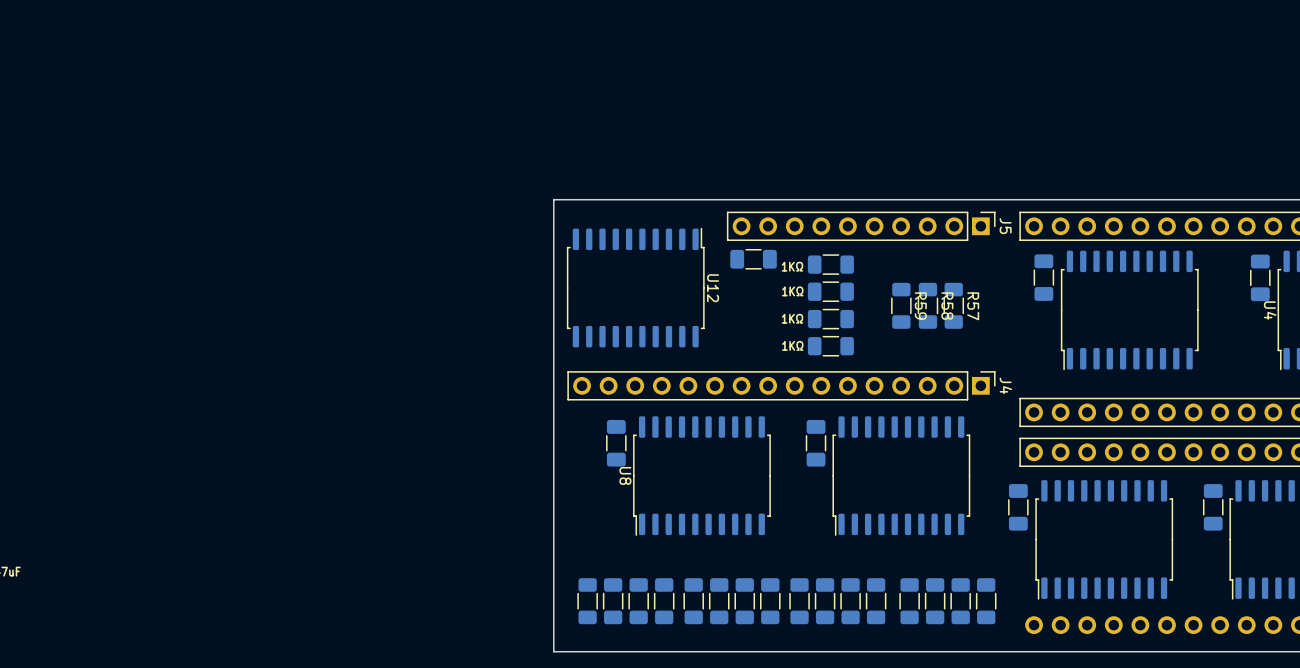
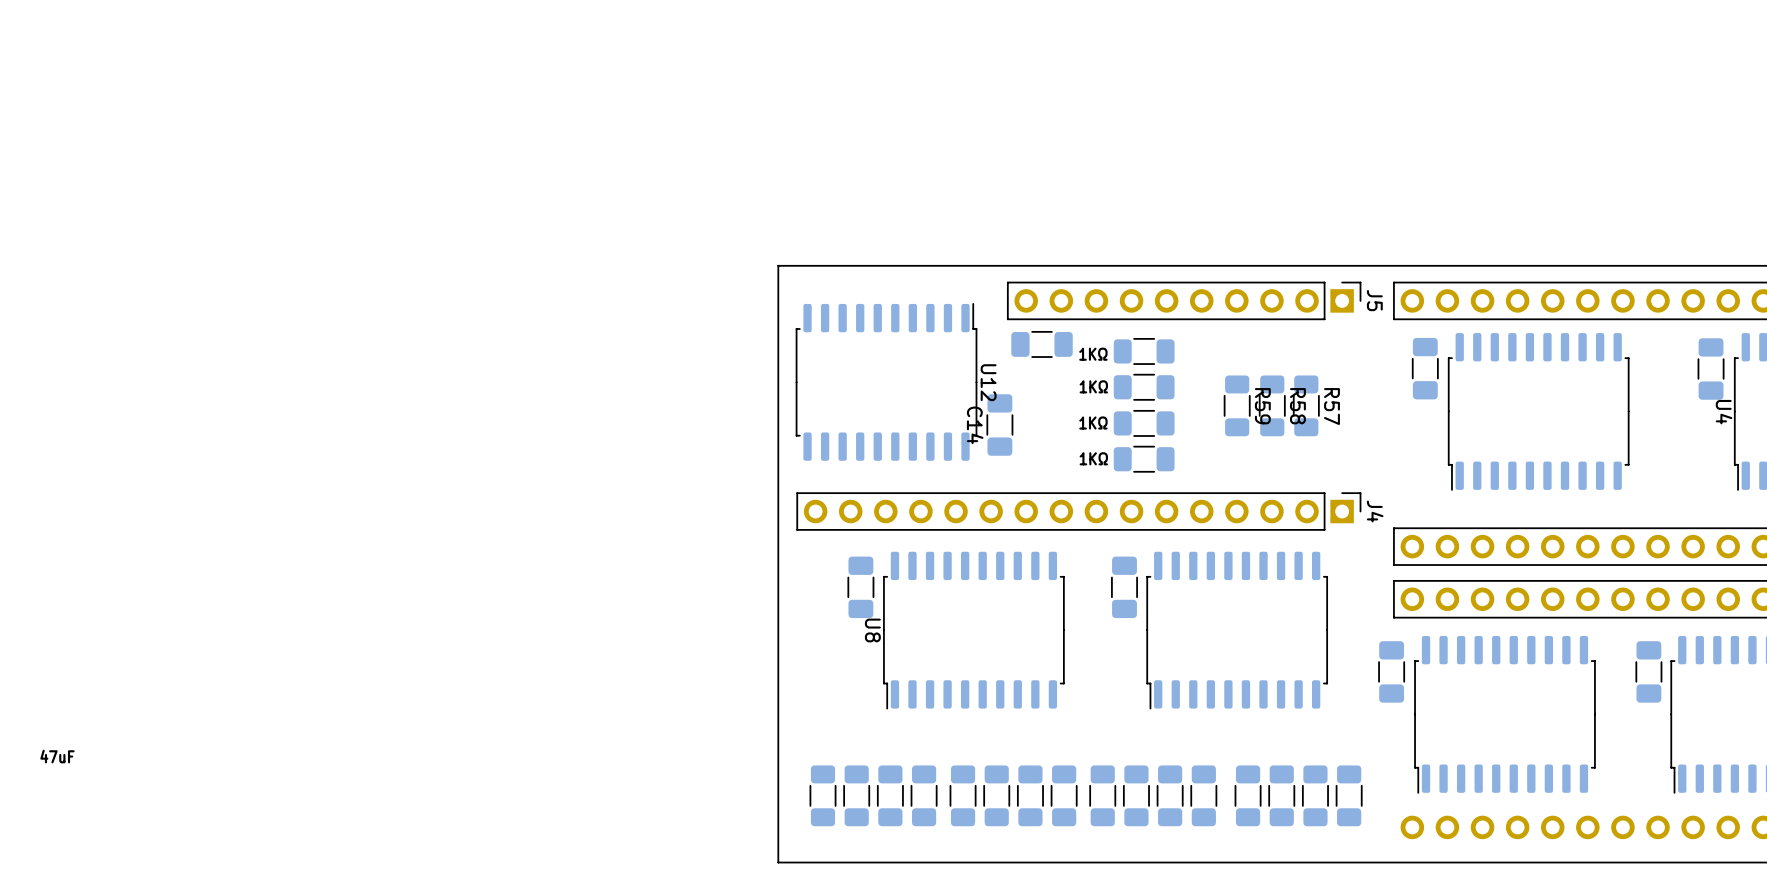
C14: none -> (999, 425)

